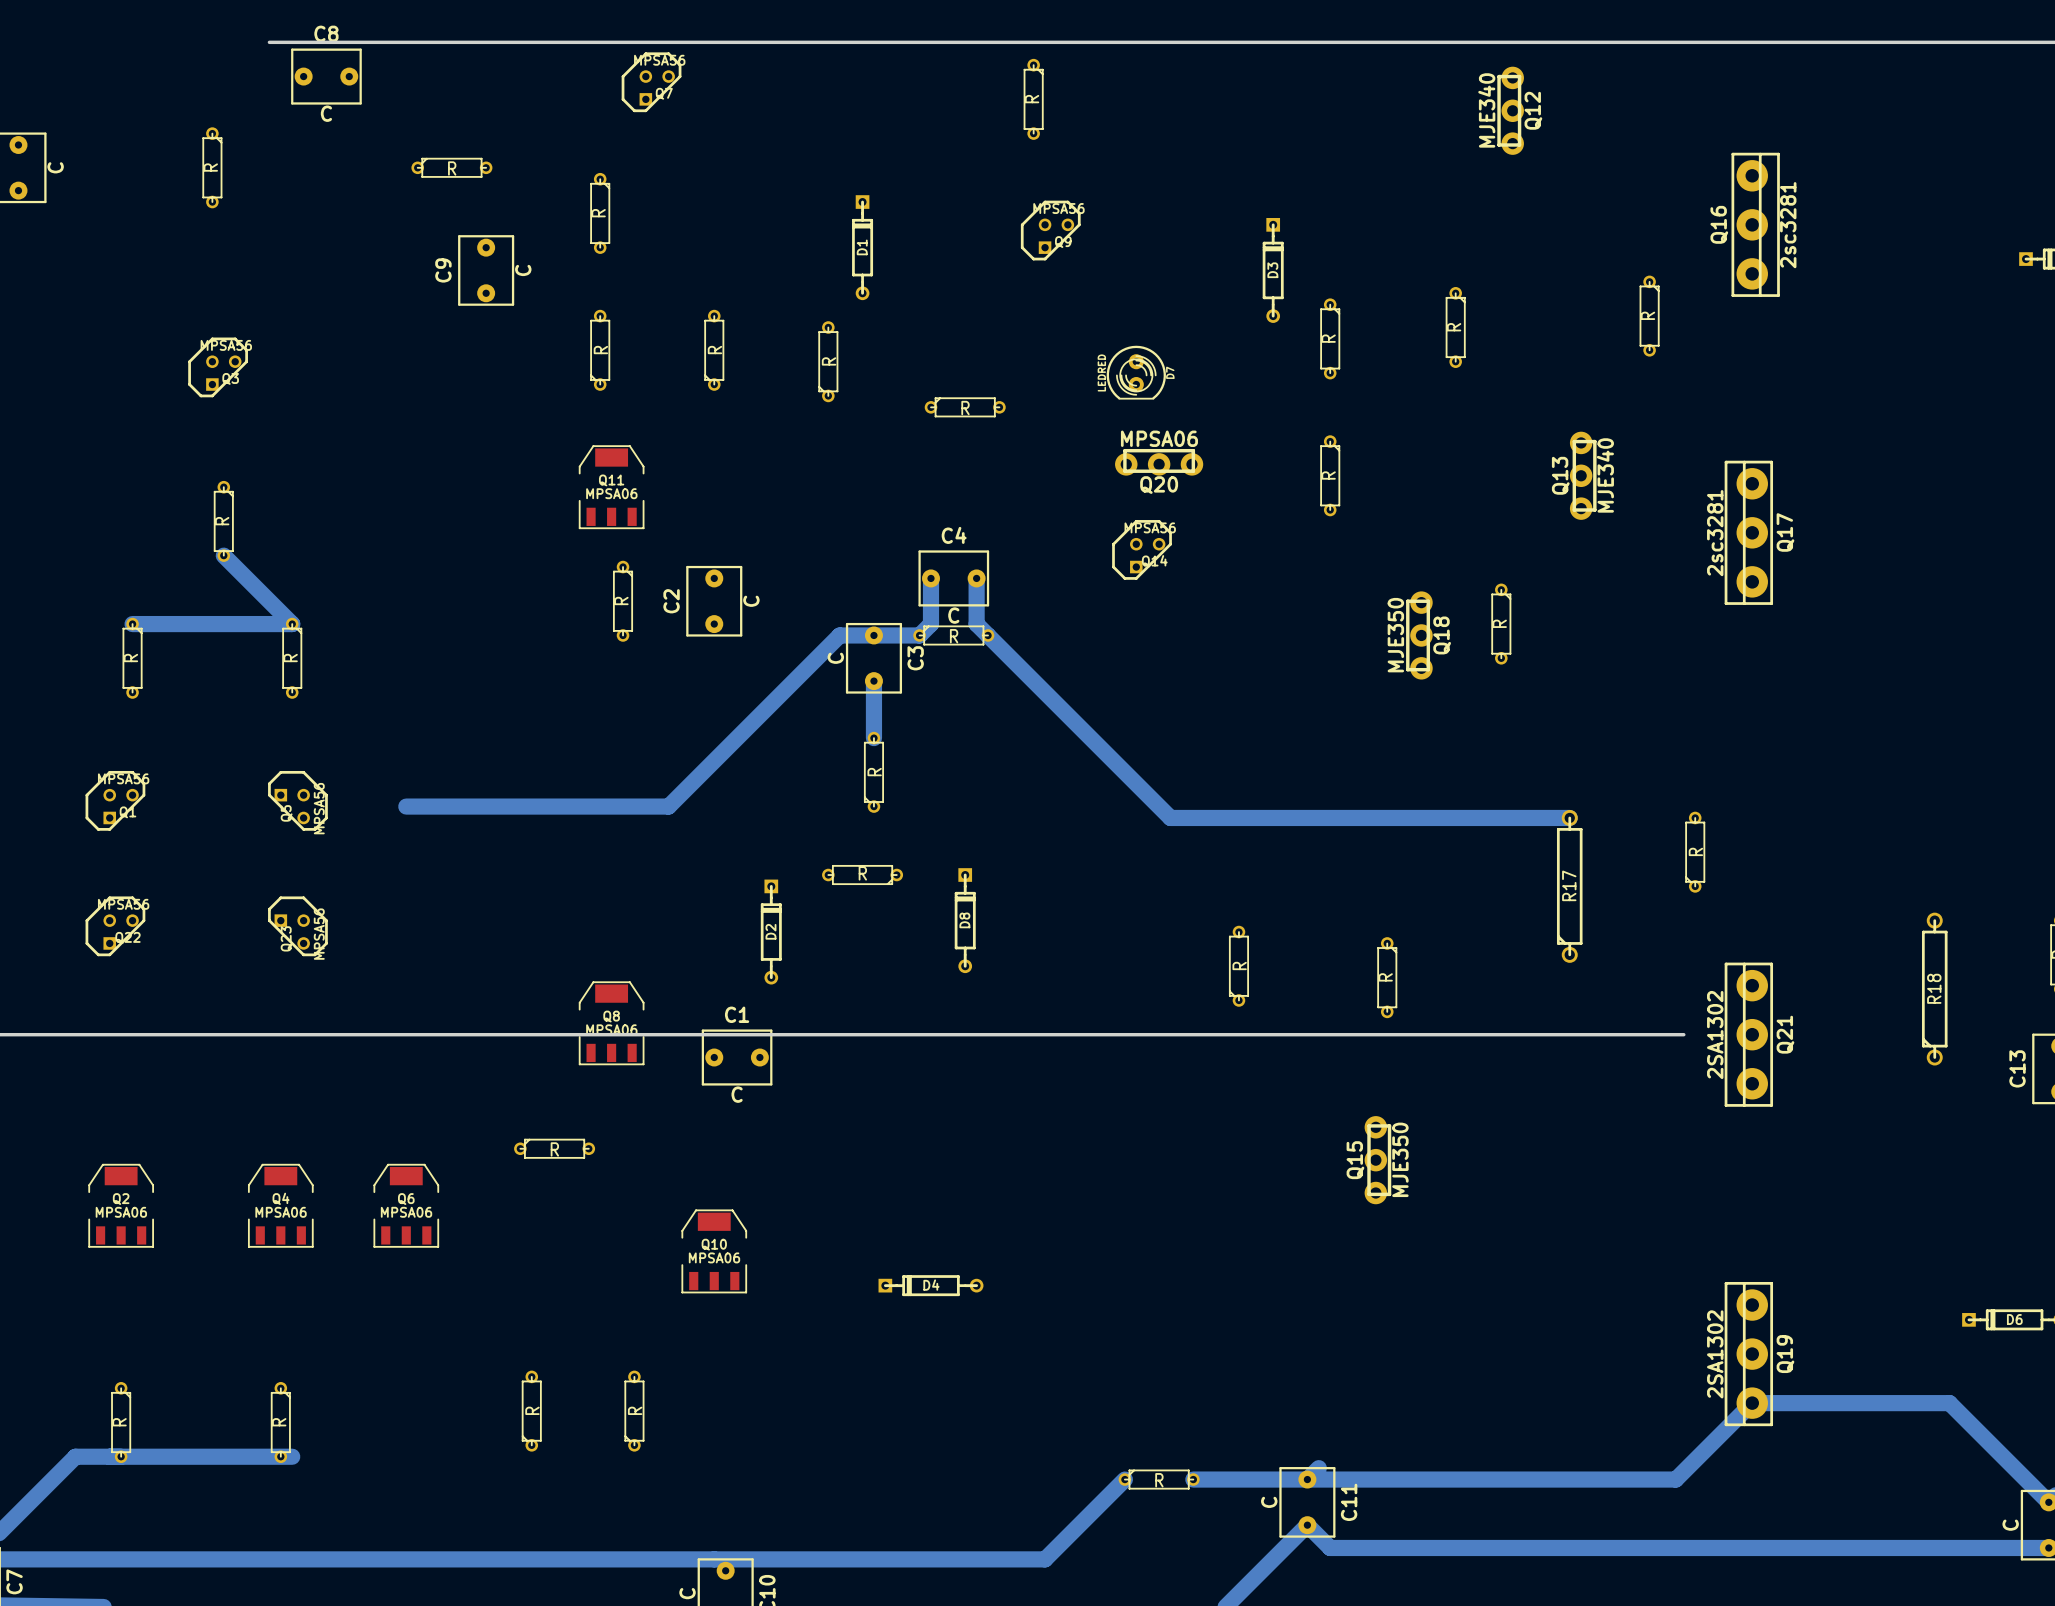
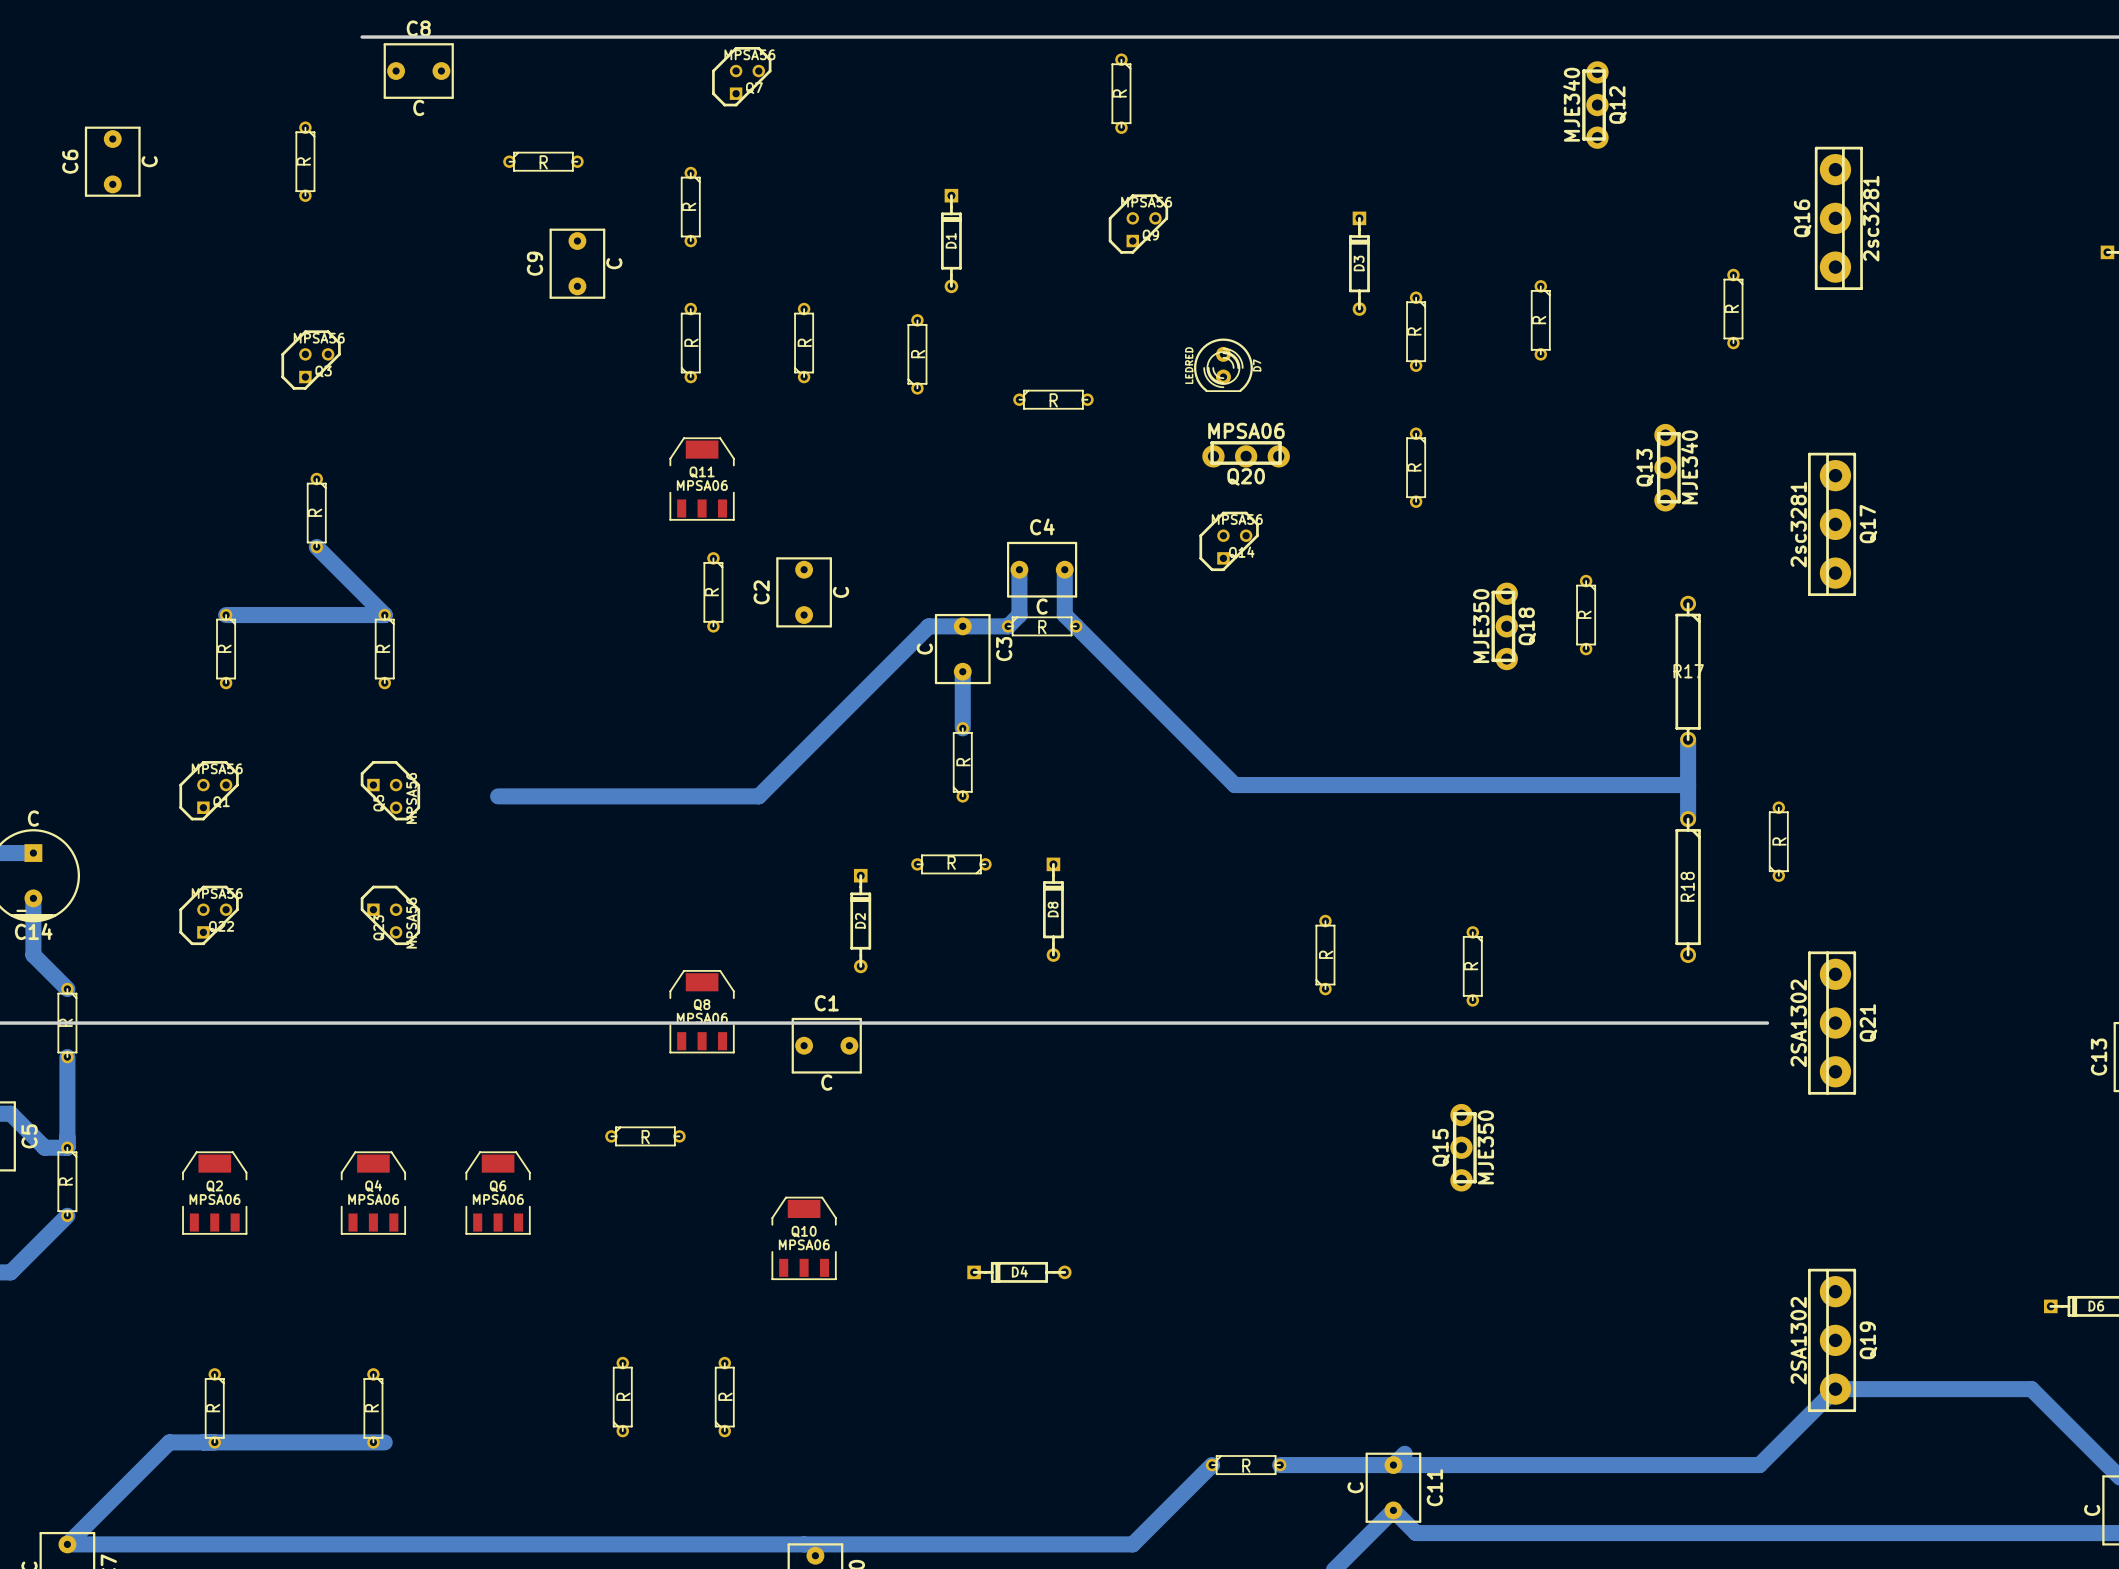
bottom track: none -> (1688, 739) (1688, 819)
bottom track: (1147, 795) (1170, 817) (1569, 817) -> (1234, 785) (1688, 785)
R17 rotation: 0° (1569, 886) -> 180° (1688, 671)
R17 position: (1569, 886) -> (1688, 671)
R18 rotation: 0° (1934, 989) -> 180° (1688, 887)
R18 position: (1934, 989) -> (1688, 887)

